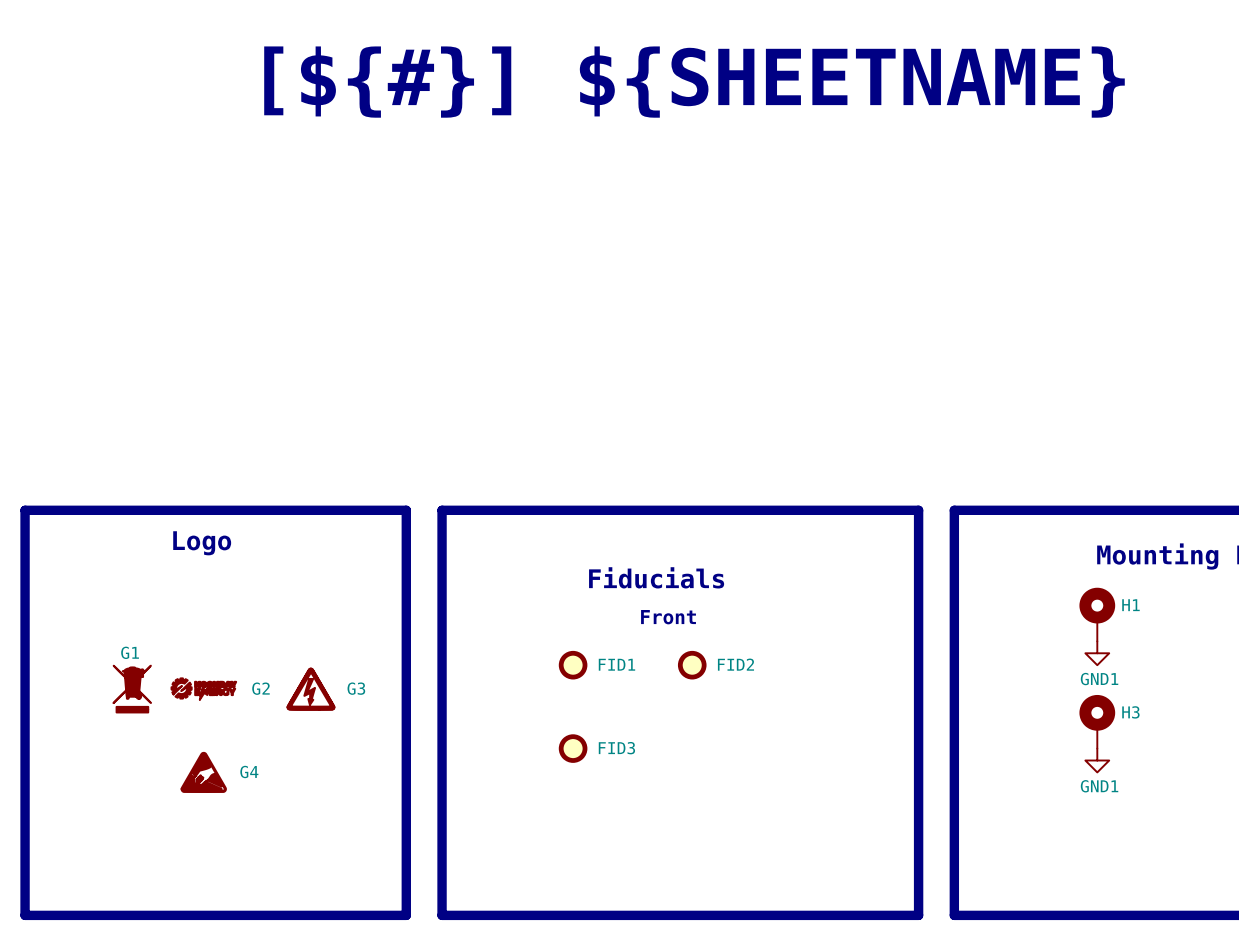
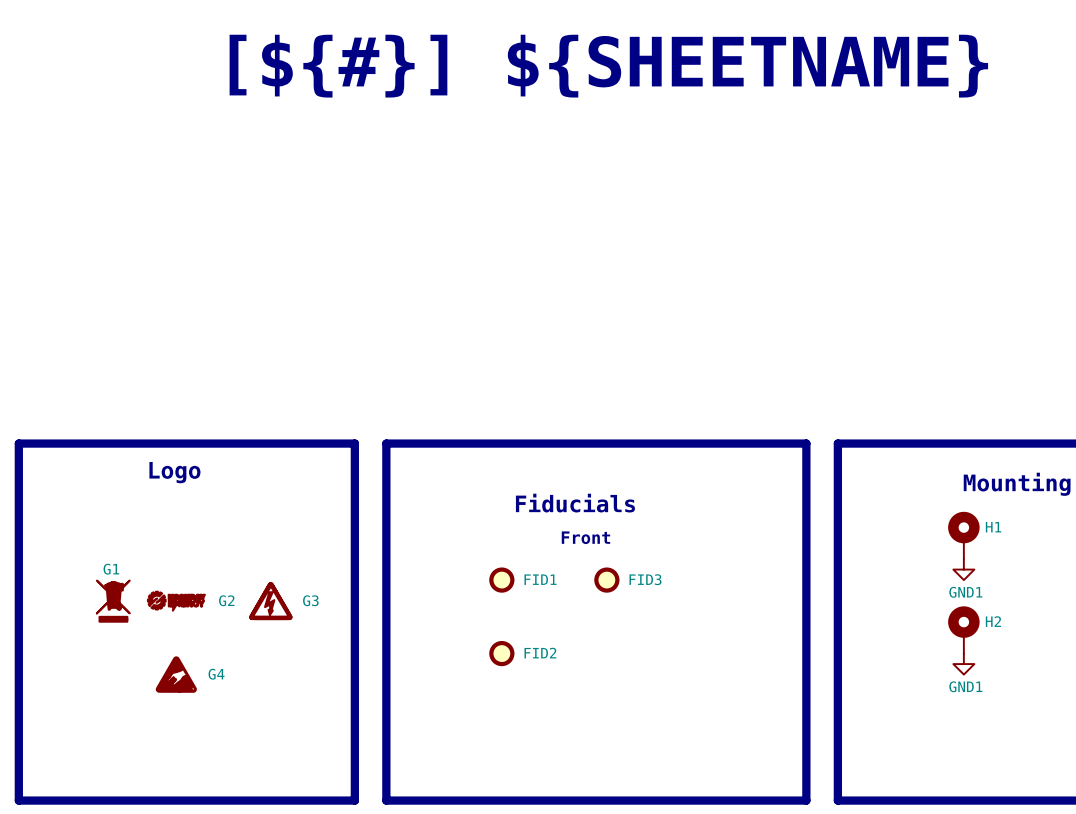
FID2 name: FID2 (735, 664) -> FID3 (645, 579)
H3 name: H3 (1130, 712) -> H2 (993, 621)
FID3 name: FID3 (616, 748) -> FID2 (540, 653)

